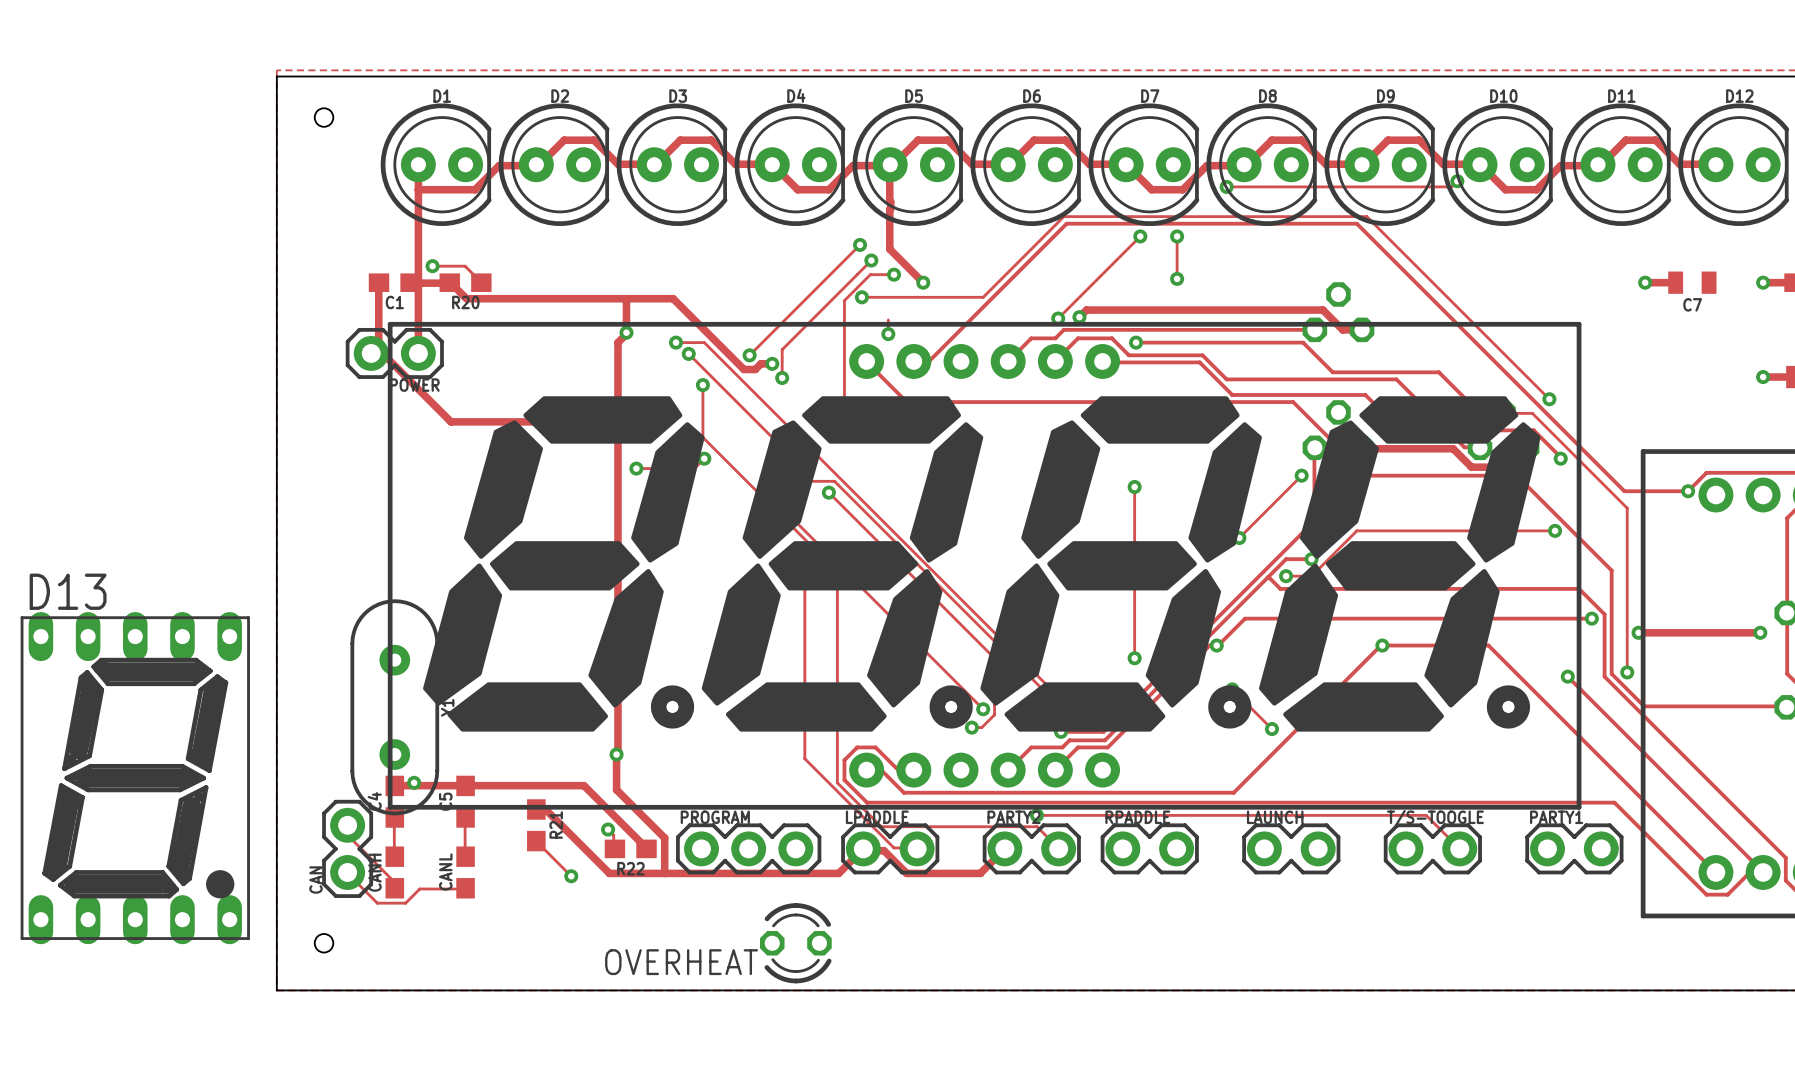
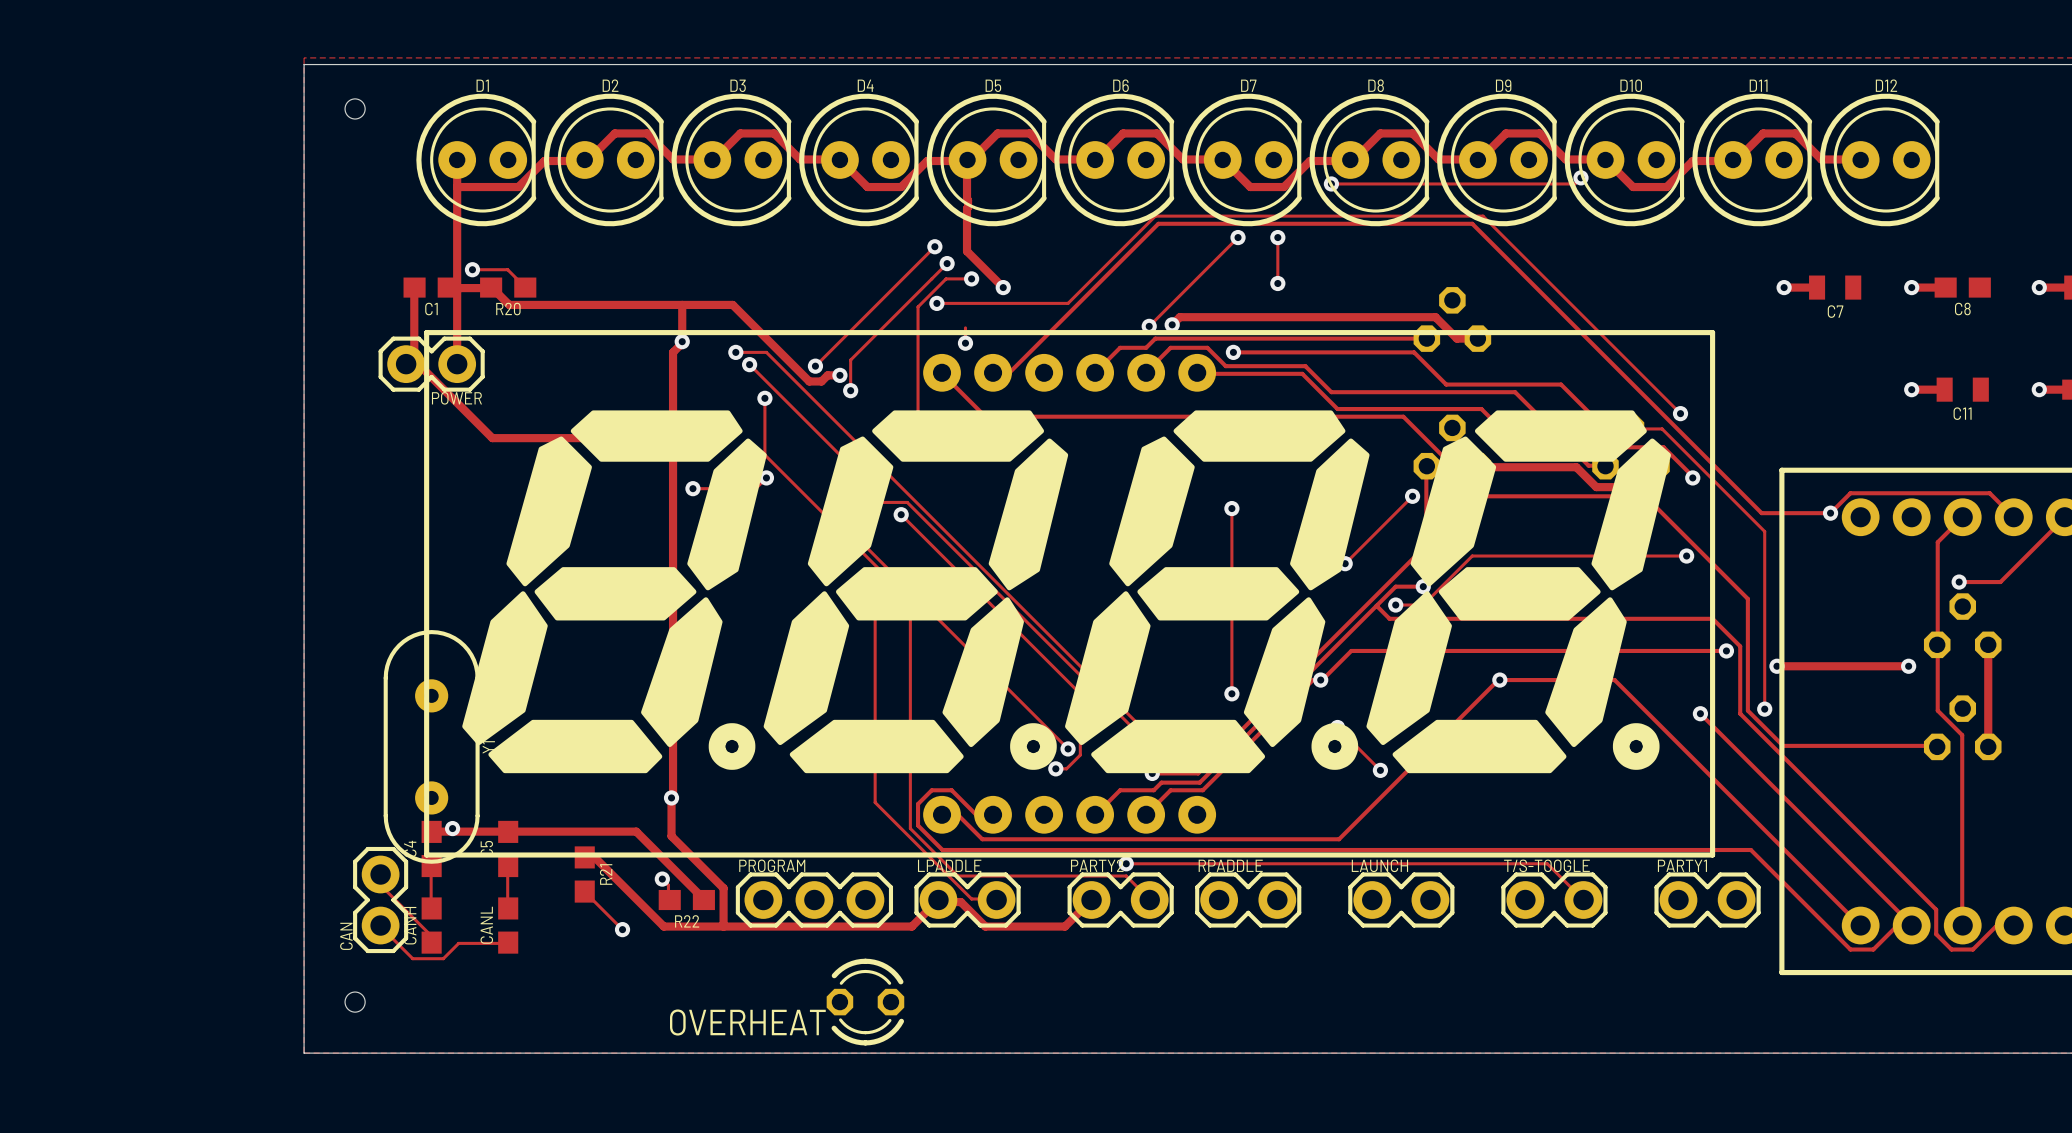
D13: (135, 778) -> none

